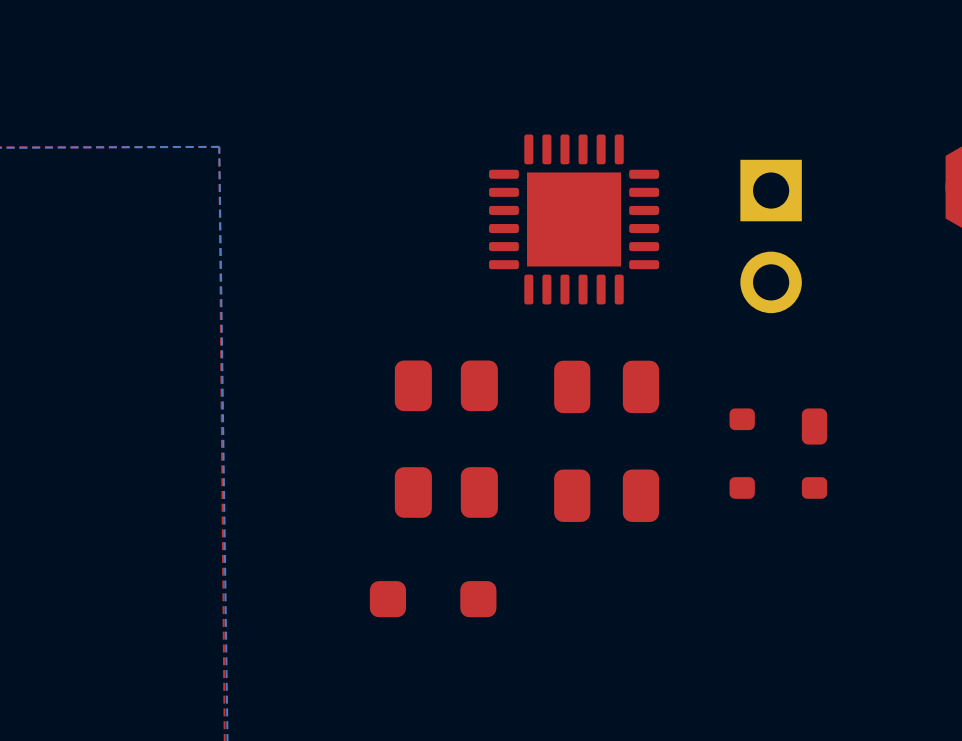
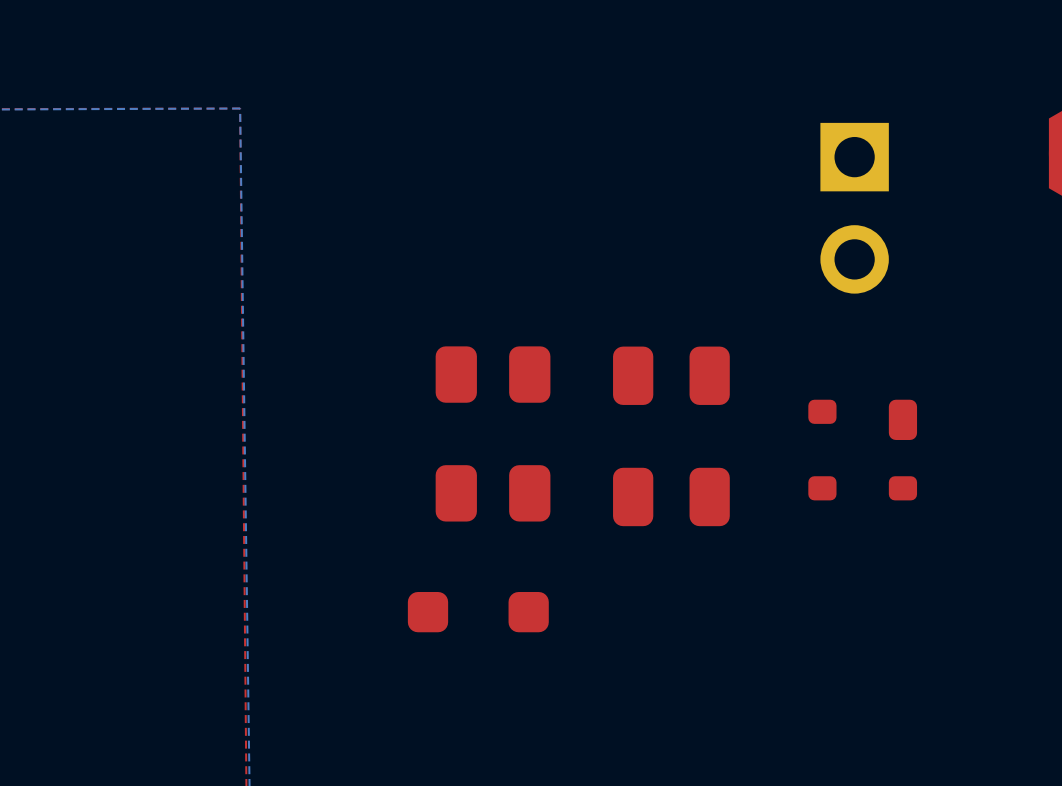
part: (574, 219) -> none

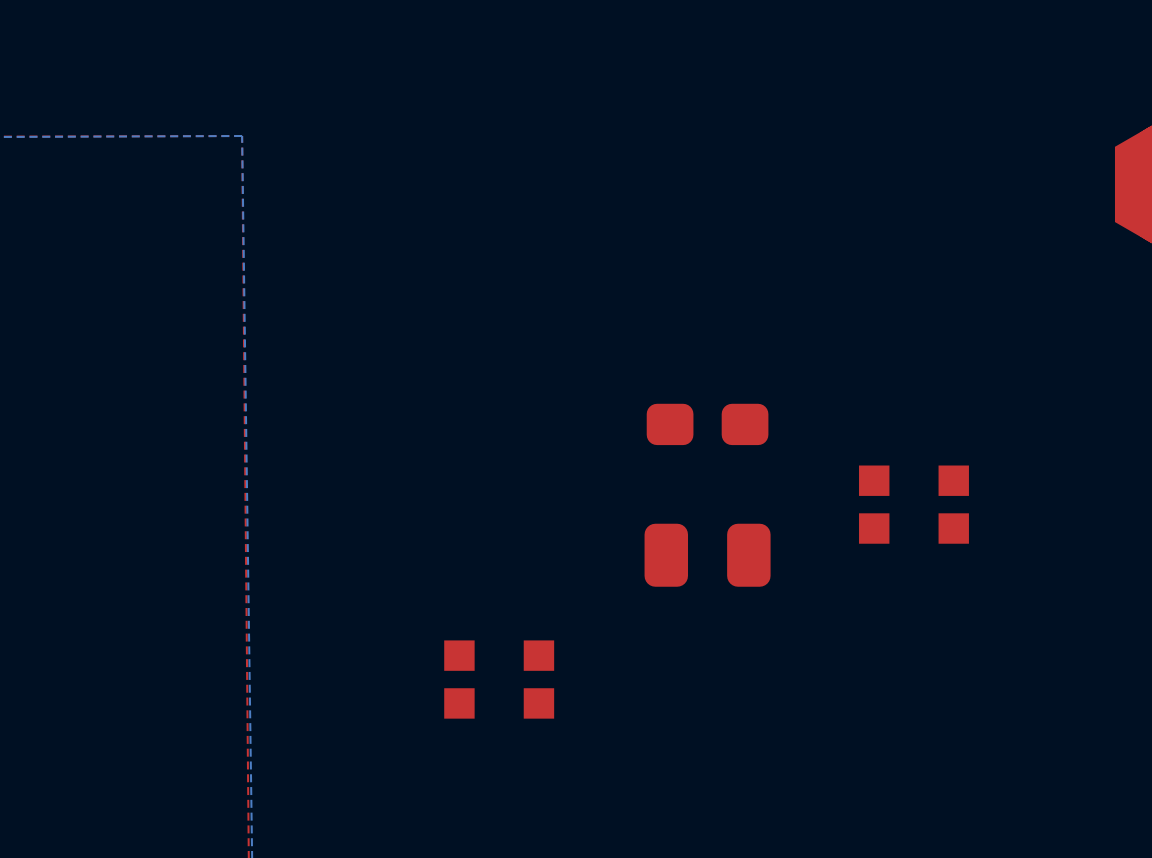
part: (854, 208) -> none
part footprint: [613, 346, 730, 405] -> [646, 403, 769, 446]
part: (493, 374) -> none
part footprint: [808, 399, 918, 501] -> [859, 465, 969, 544]
part: (493, 493) -> none
part footprint: [407, 592, 549, 633] -> [444, 640, 555, 719]

